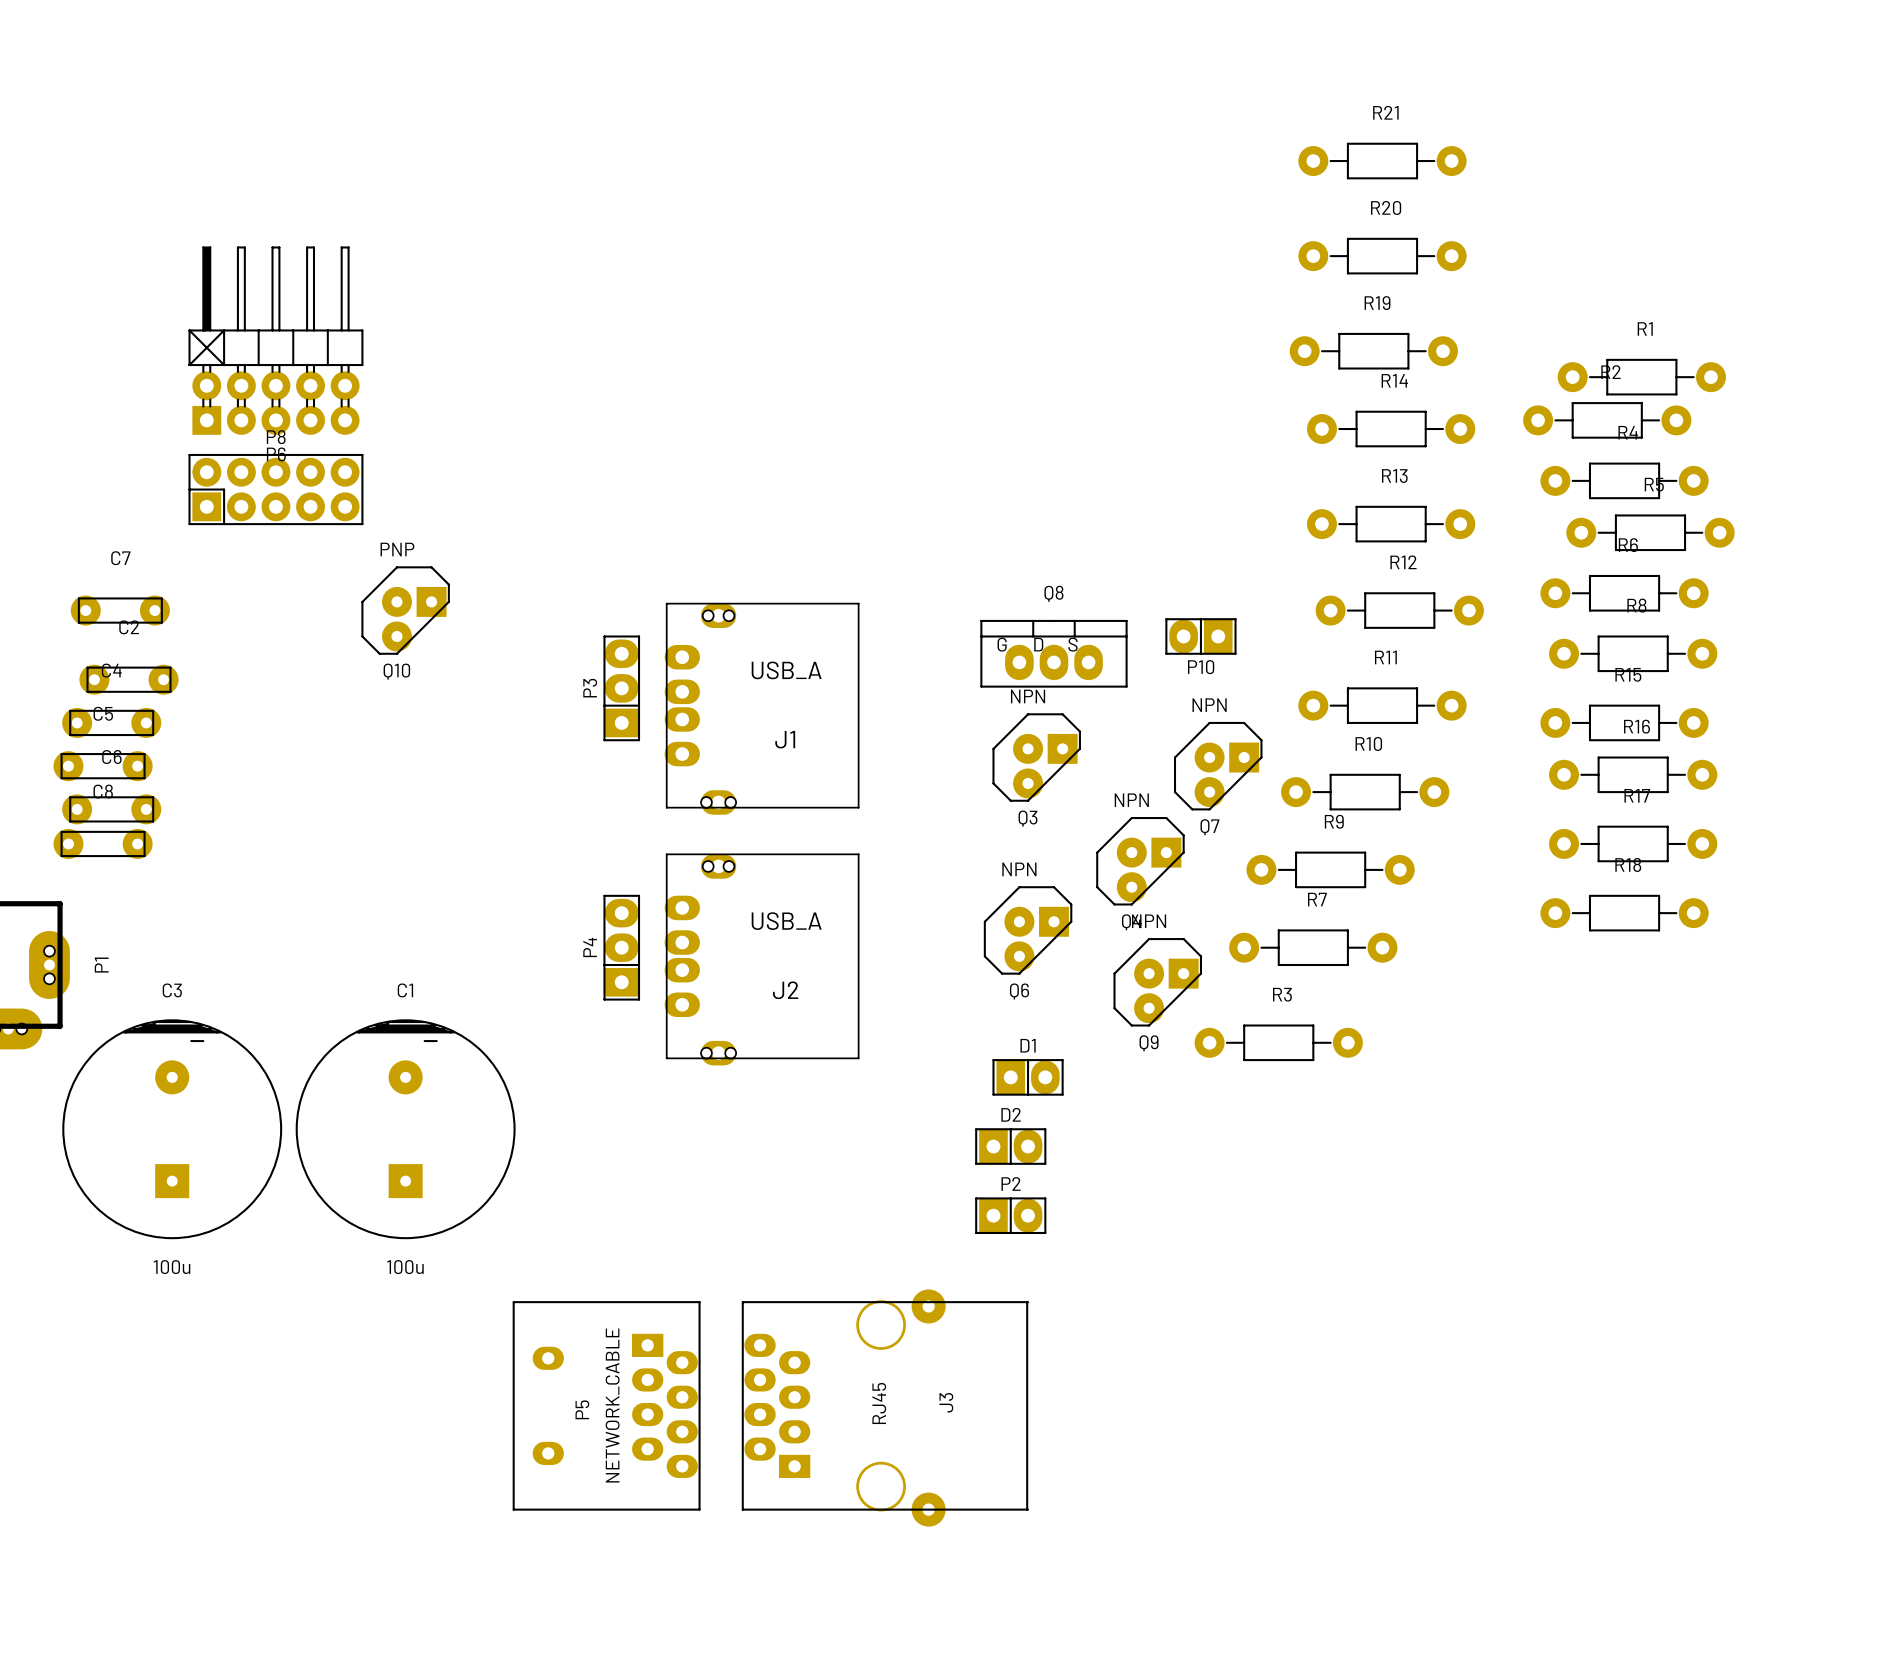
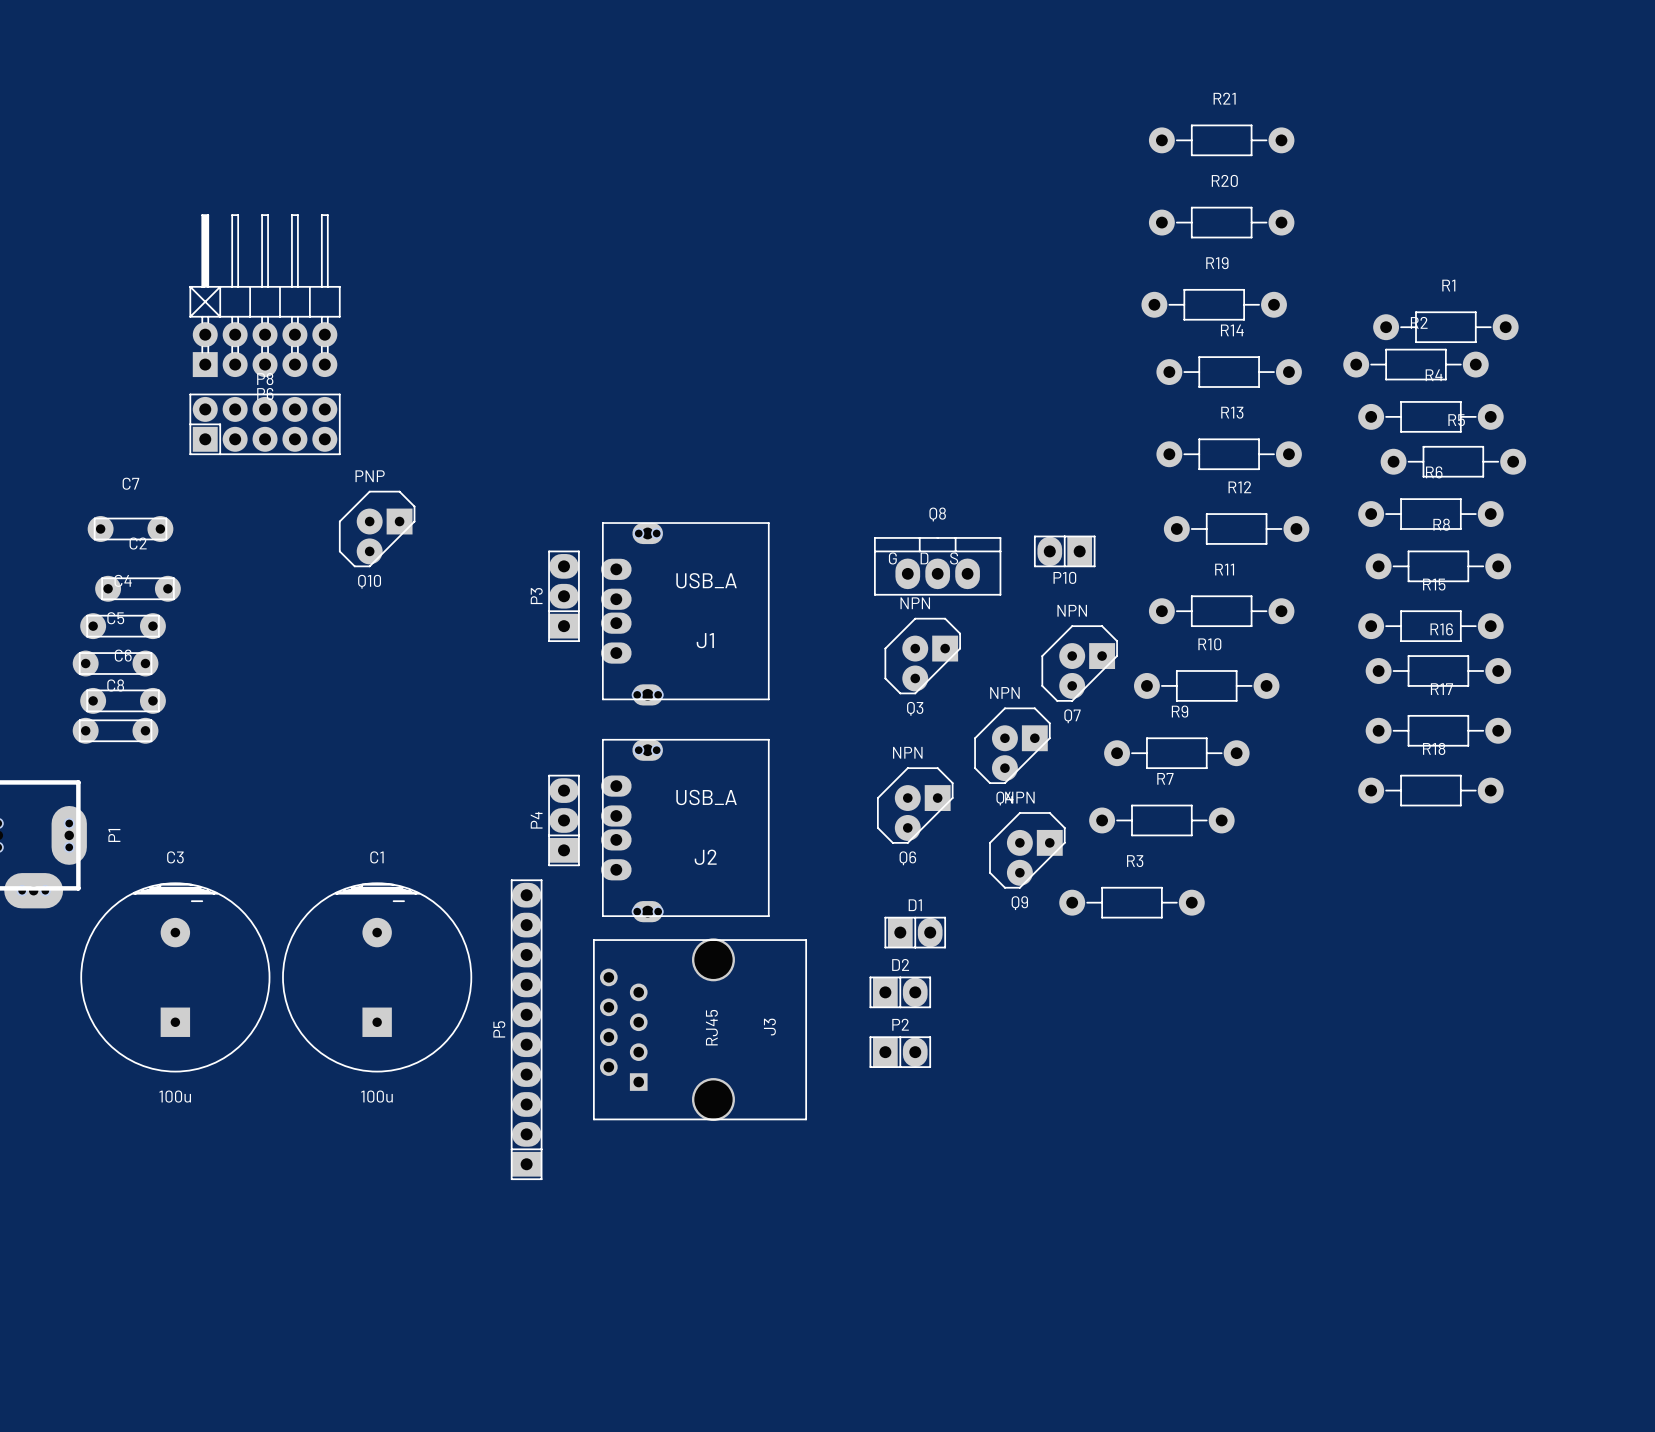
J3 footprint: [741, 1289, 1030, 1527] -> [593, 938, 808, 1122]
P5 footprint: [512, 1301, 701, 1511] -> [510, 879, 543, 1181]
P5 value: NETWORK_CABLE (612, 1405) -> none

